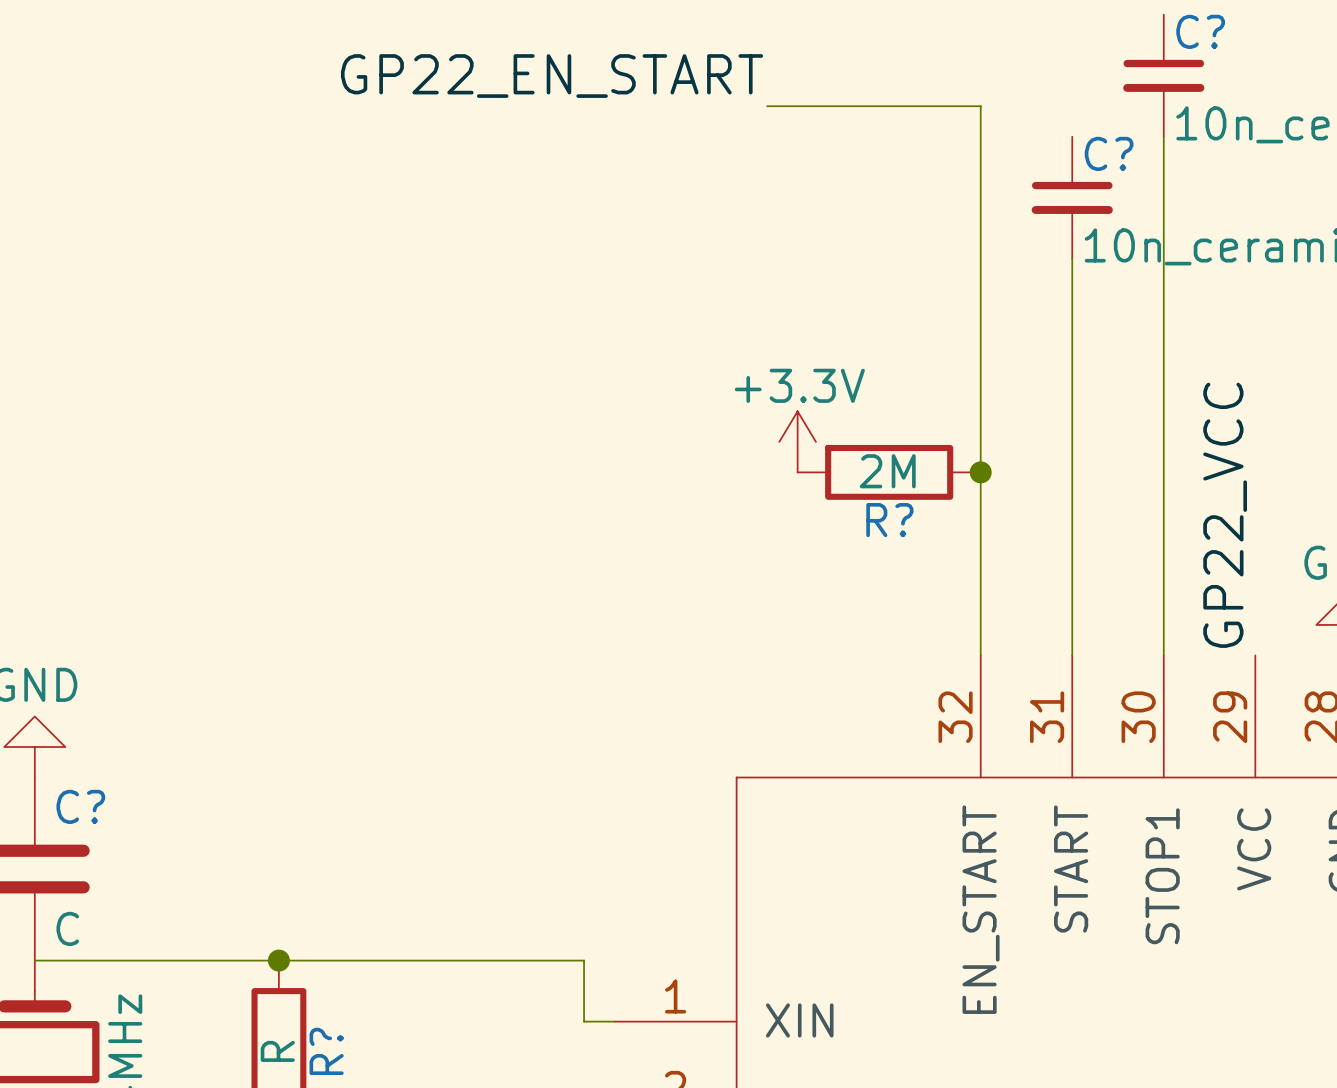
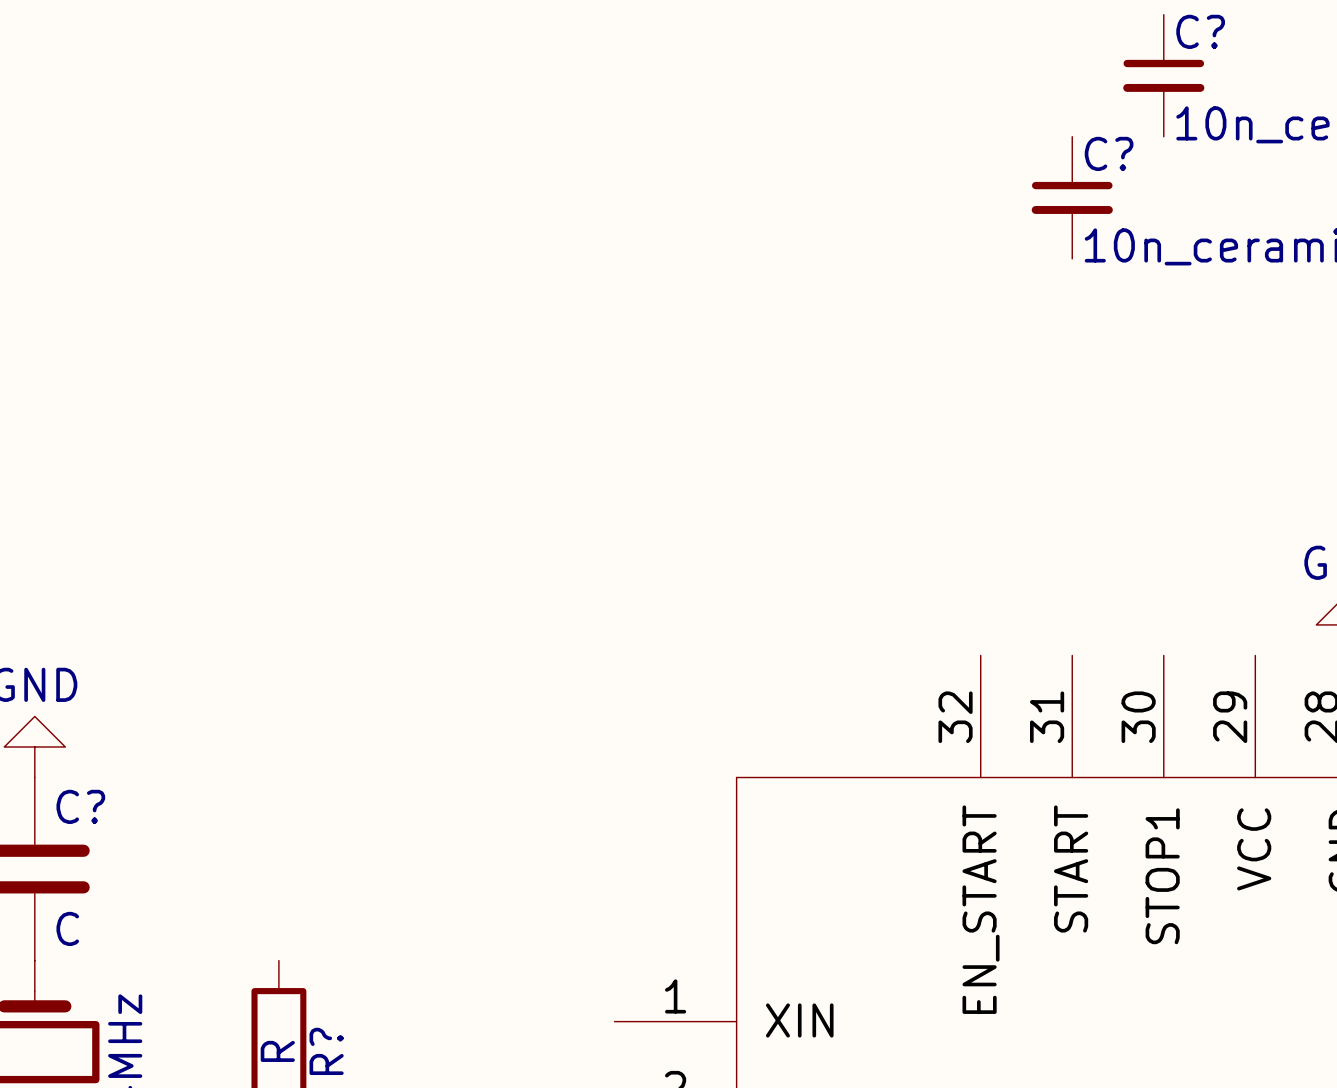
label: GP22_EN_START (551, 76) -> none
wire: (767, 106) (980, 106) (980, 655) -> none
wire: (1163, 136) (1163, 655) -> none
wire: (1072, 258) (1072, 655) -> none
power symbol: +3.3V (797, 441) -> none
R?: 2M (889, 472) -> none
junction: (980, 472) -> none
label: GP22_VCC (1225, 515) -> none
wire: (34, 960) (584, 960) (584, 1021) (614, 1021) -> none
junction: (278, 960) -> none

